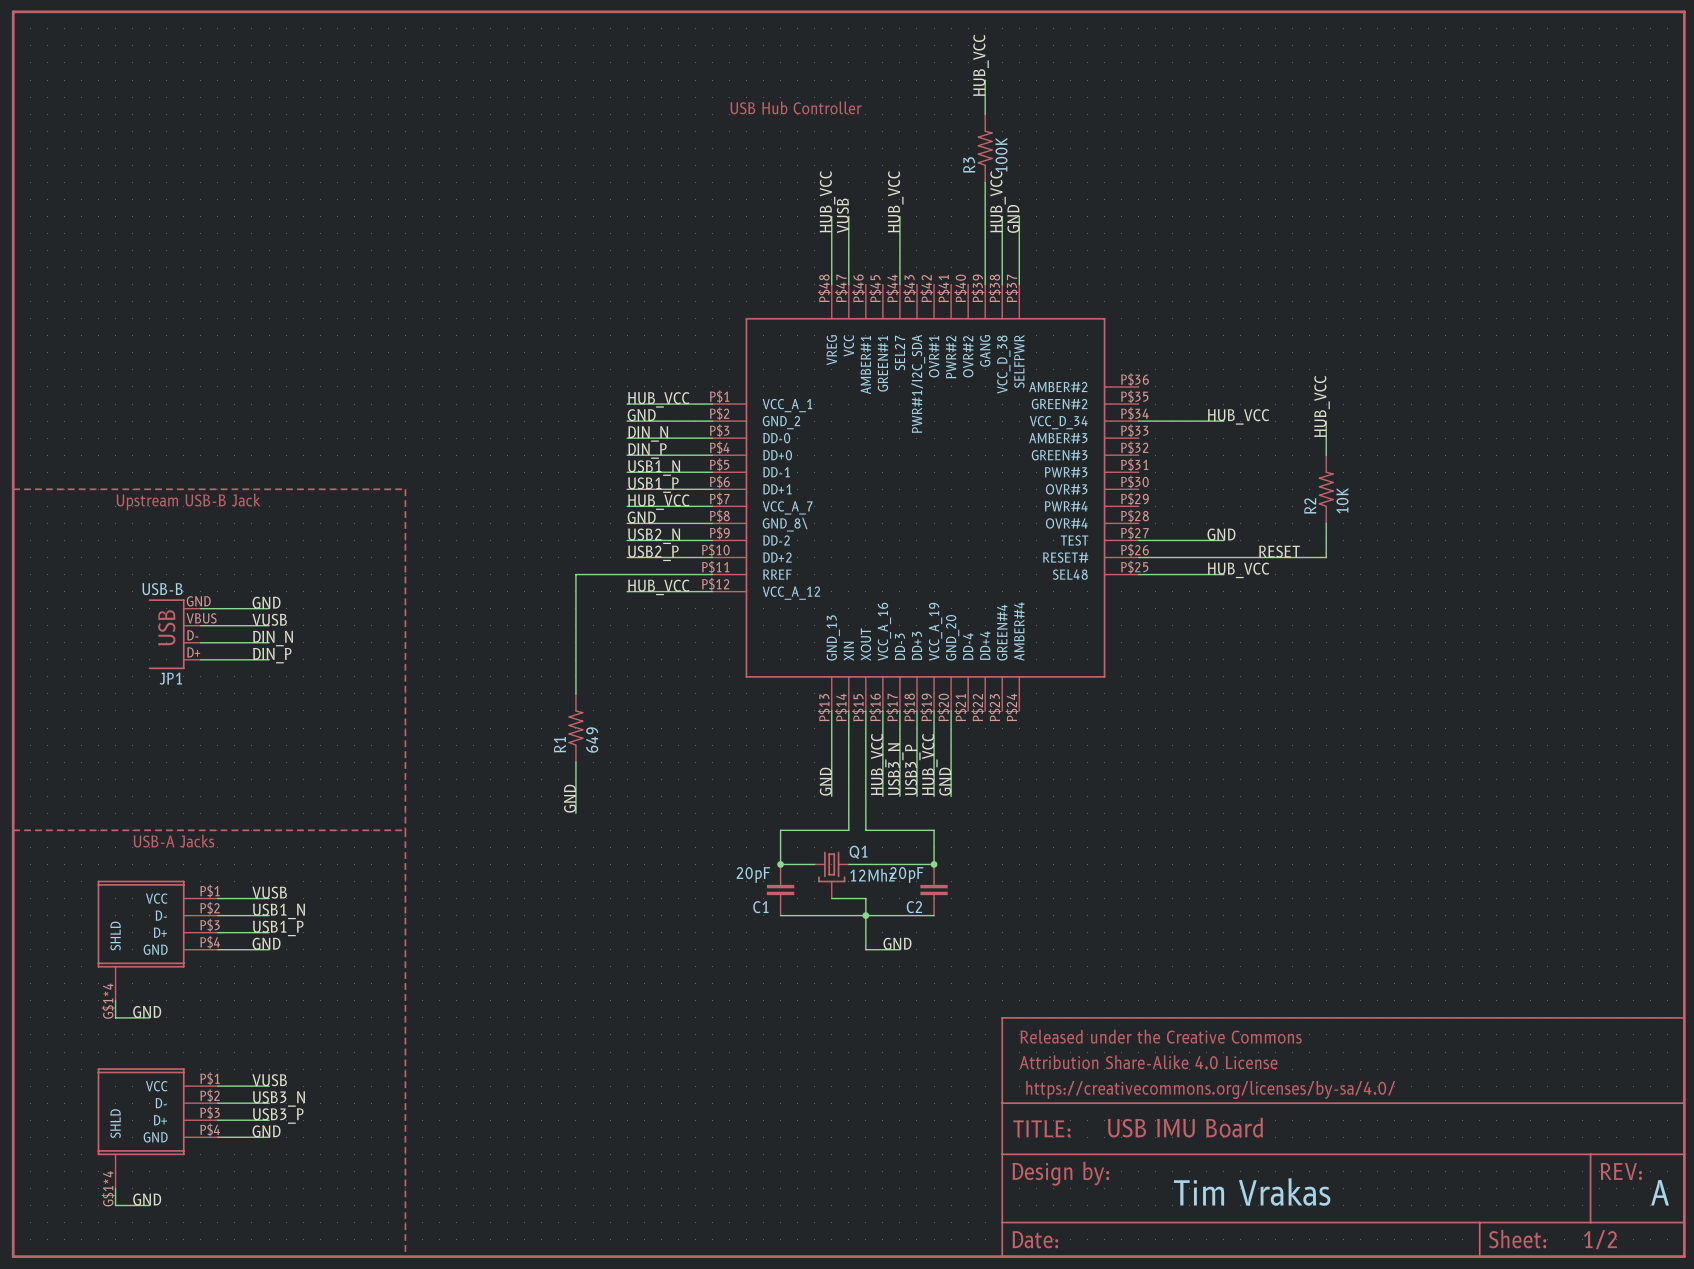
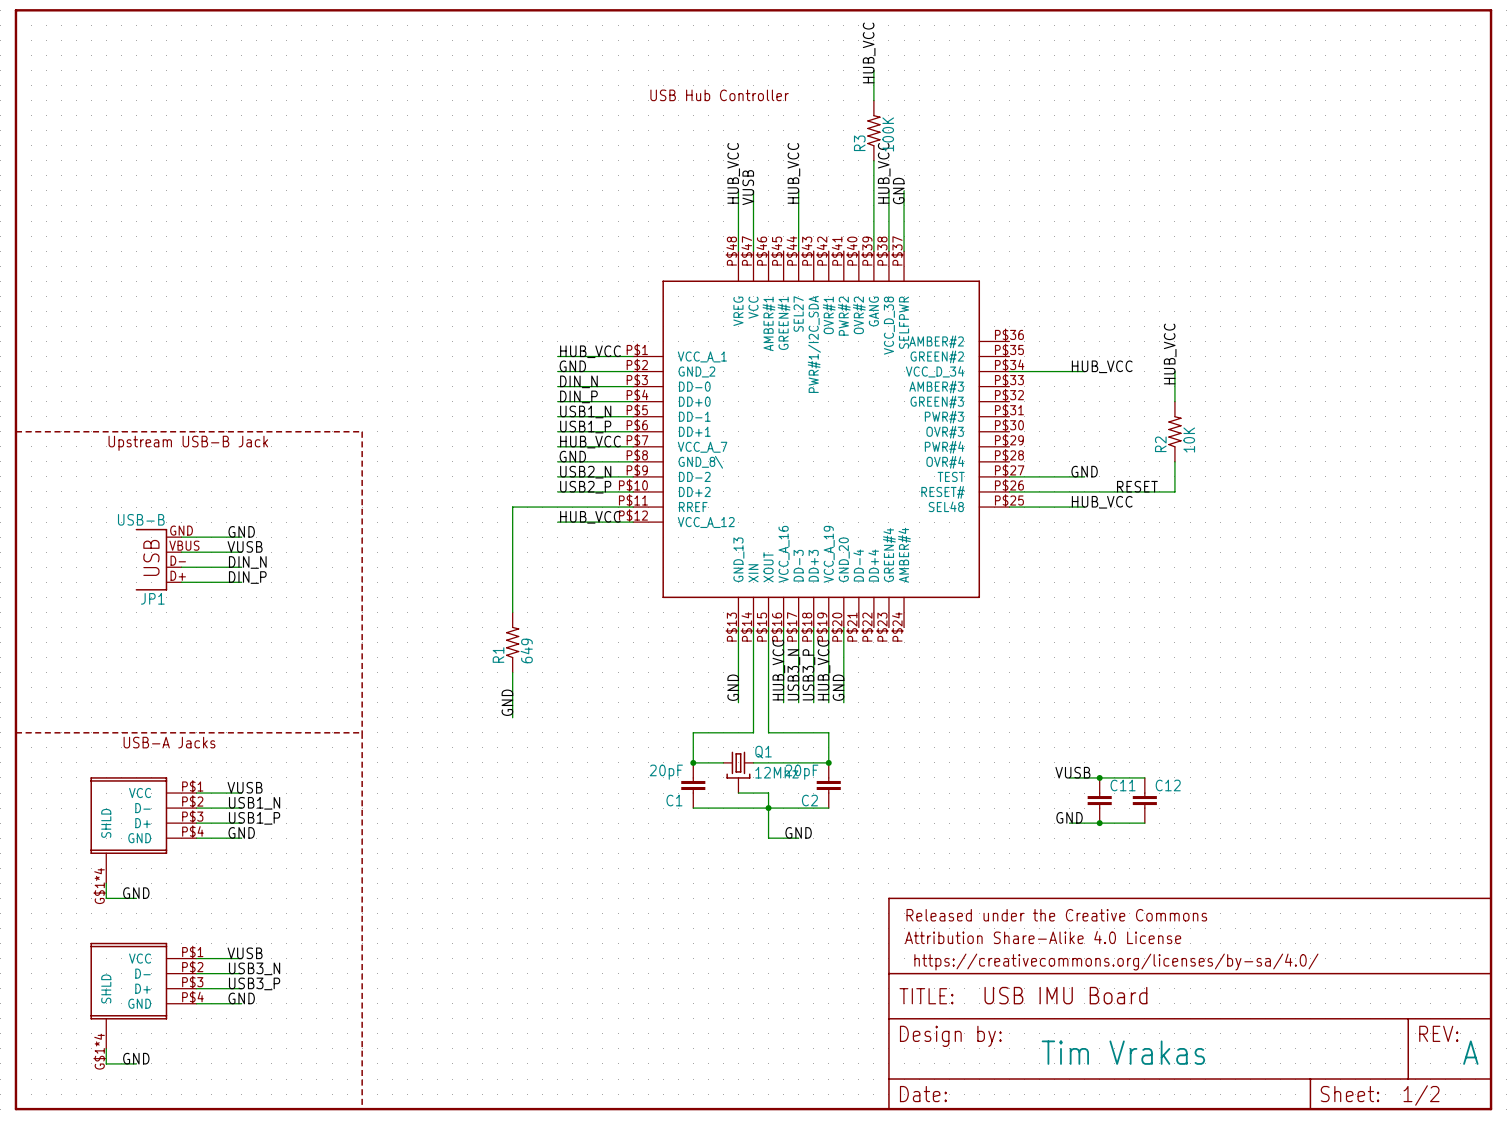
label: none -> VUSB (1072, 772)
wire: none -> (1069, 777) (1144, 777)
junction: none -> (1099, 777)
C11: none -> (1099, 800)
C12: none -> (1144, 800)
label: none -> GND (1069, 817)
wire: none -> (1069, 823) (1144, 823)
junction: none -> (1099, 823)

